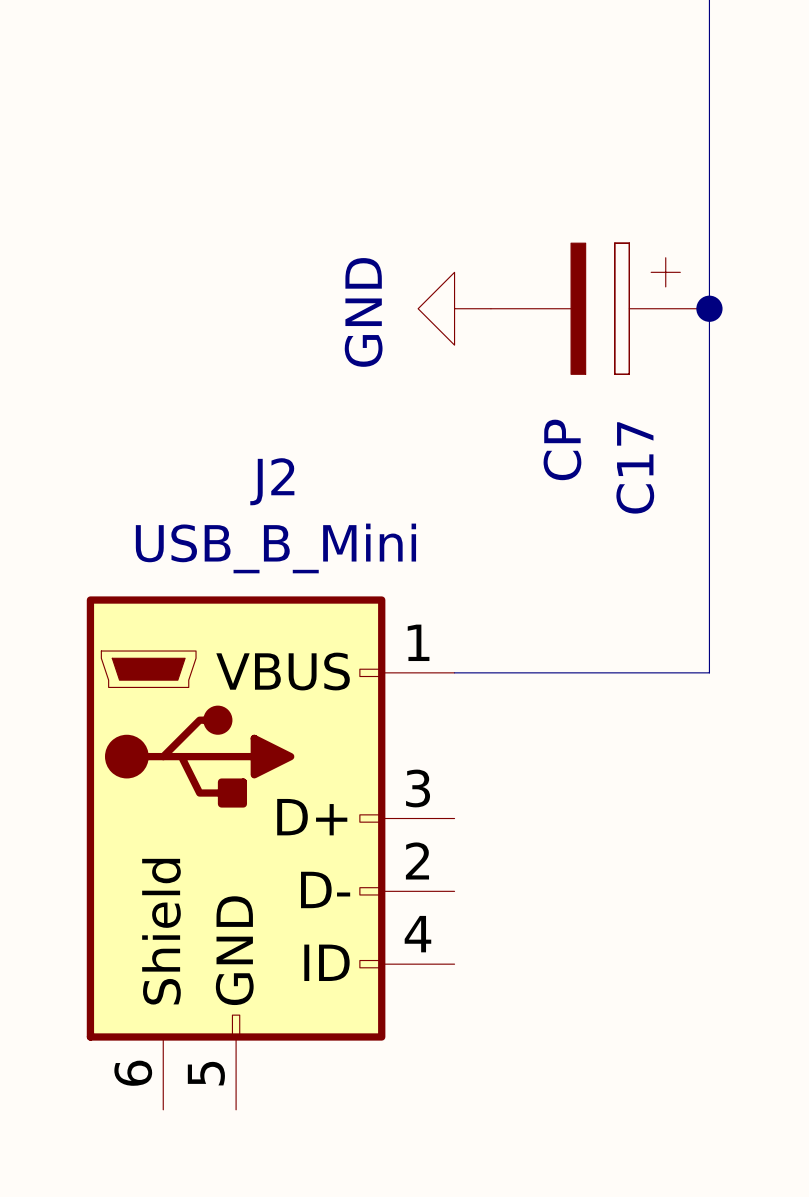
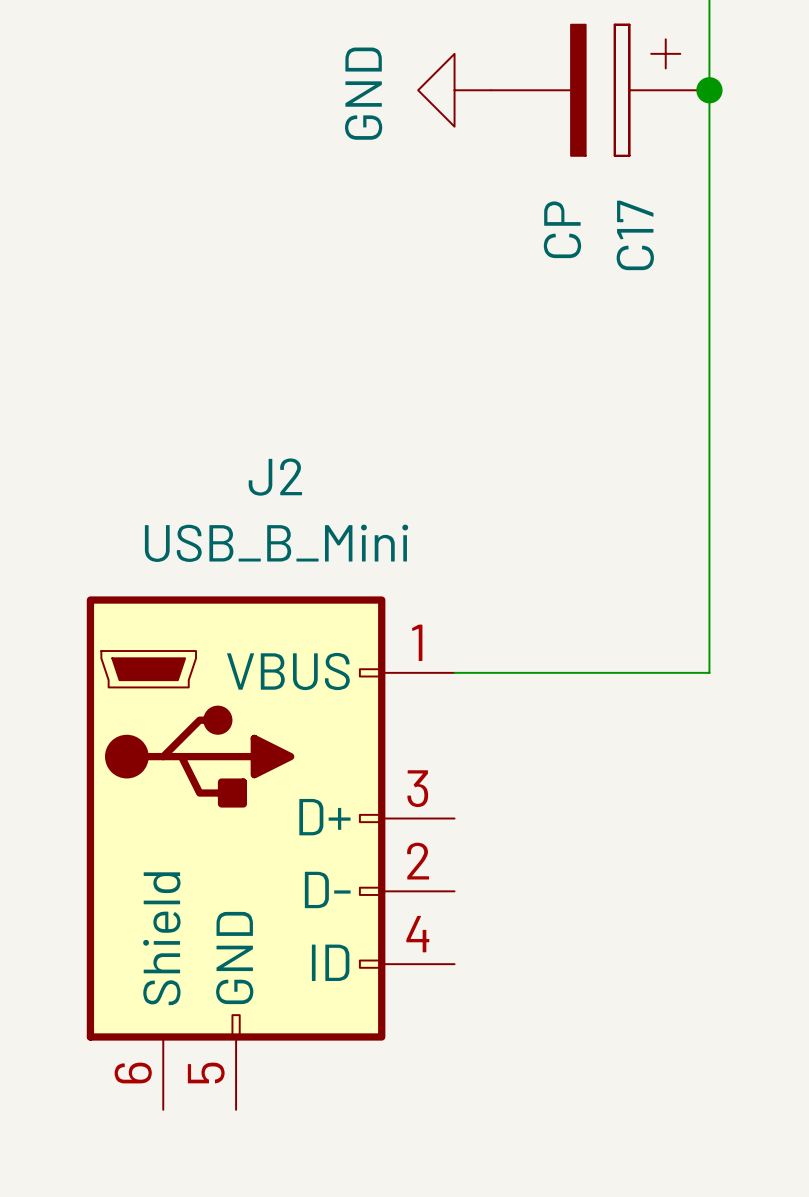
junction: none -> (709, 90)
power symbol position: GND (454, 308) -> GND (454, 90)
C17 position: (600, 308) -> (600, 90)
junction: (709, 308) -> none

